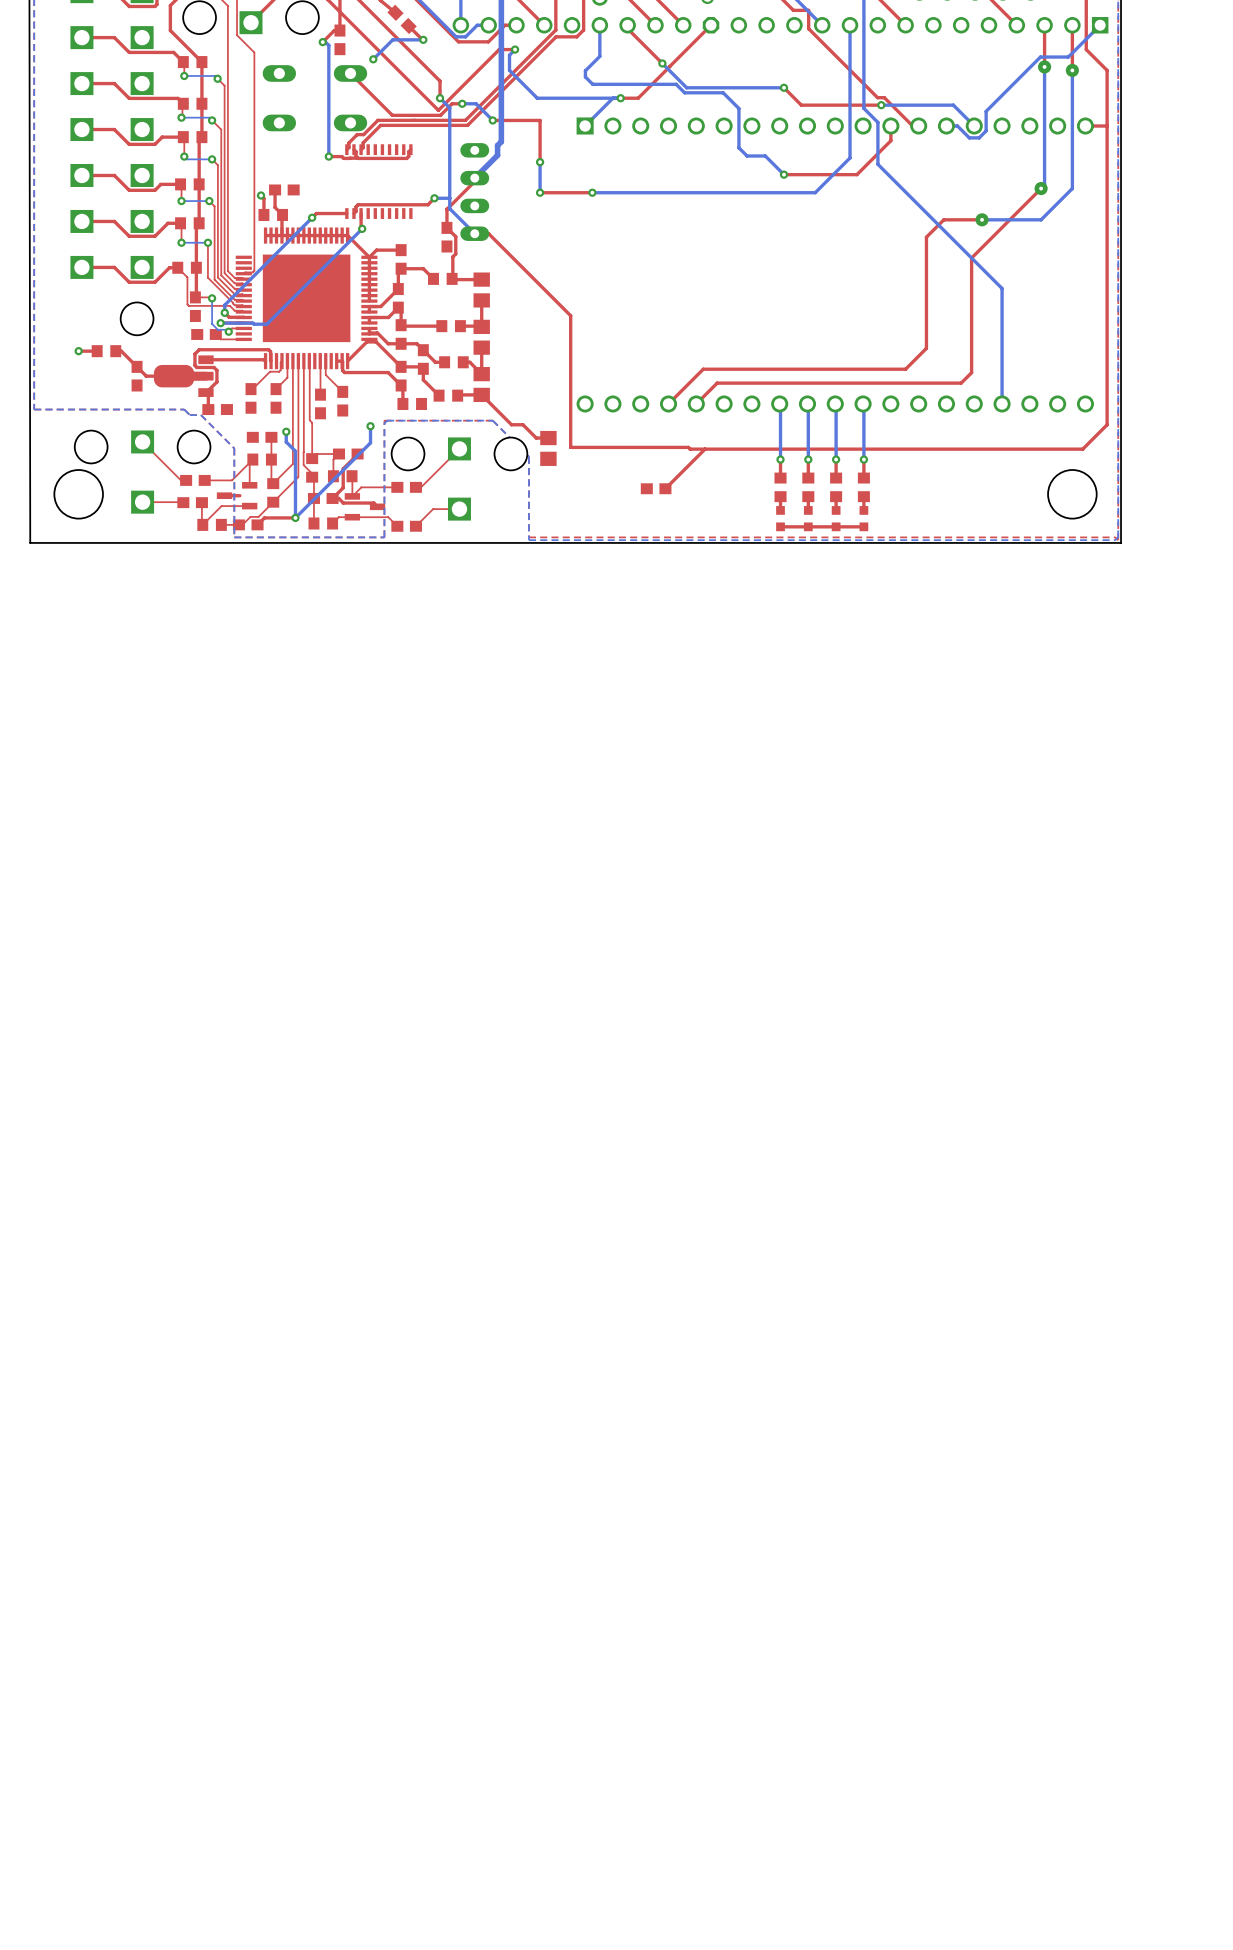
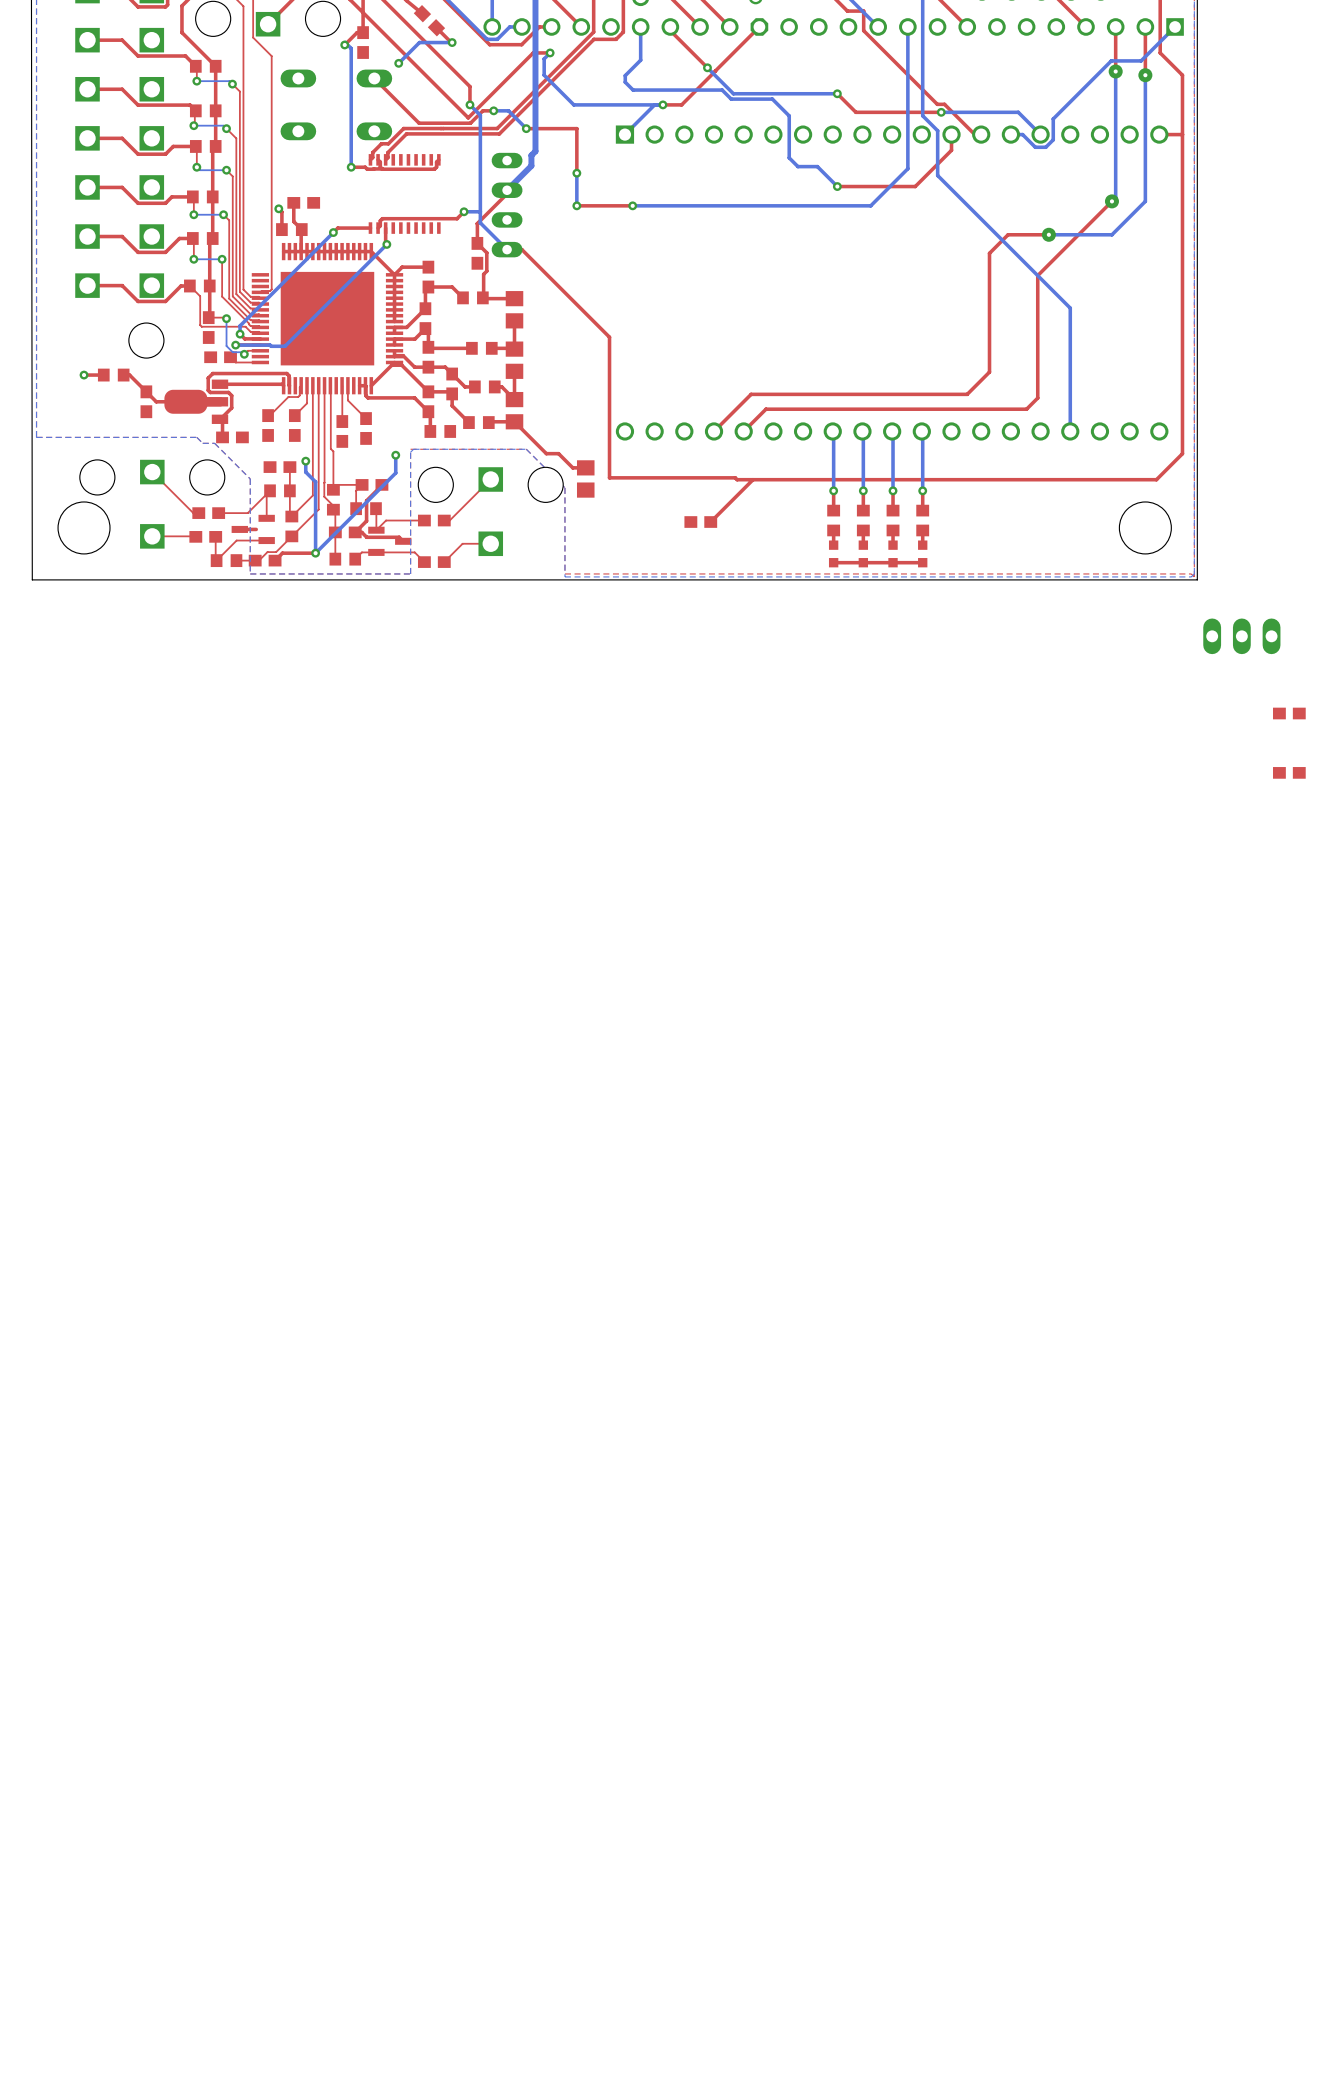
part: none -> (1241, 636)
part: none -> (1289, 713)
part: none -> (1289, 772)

